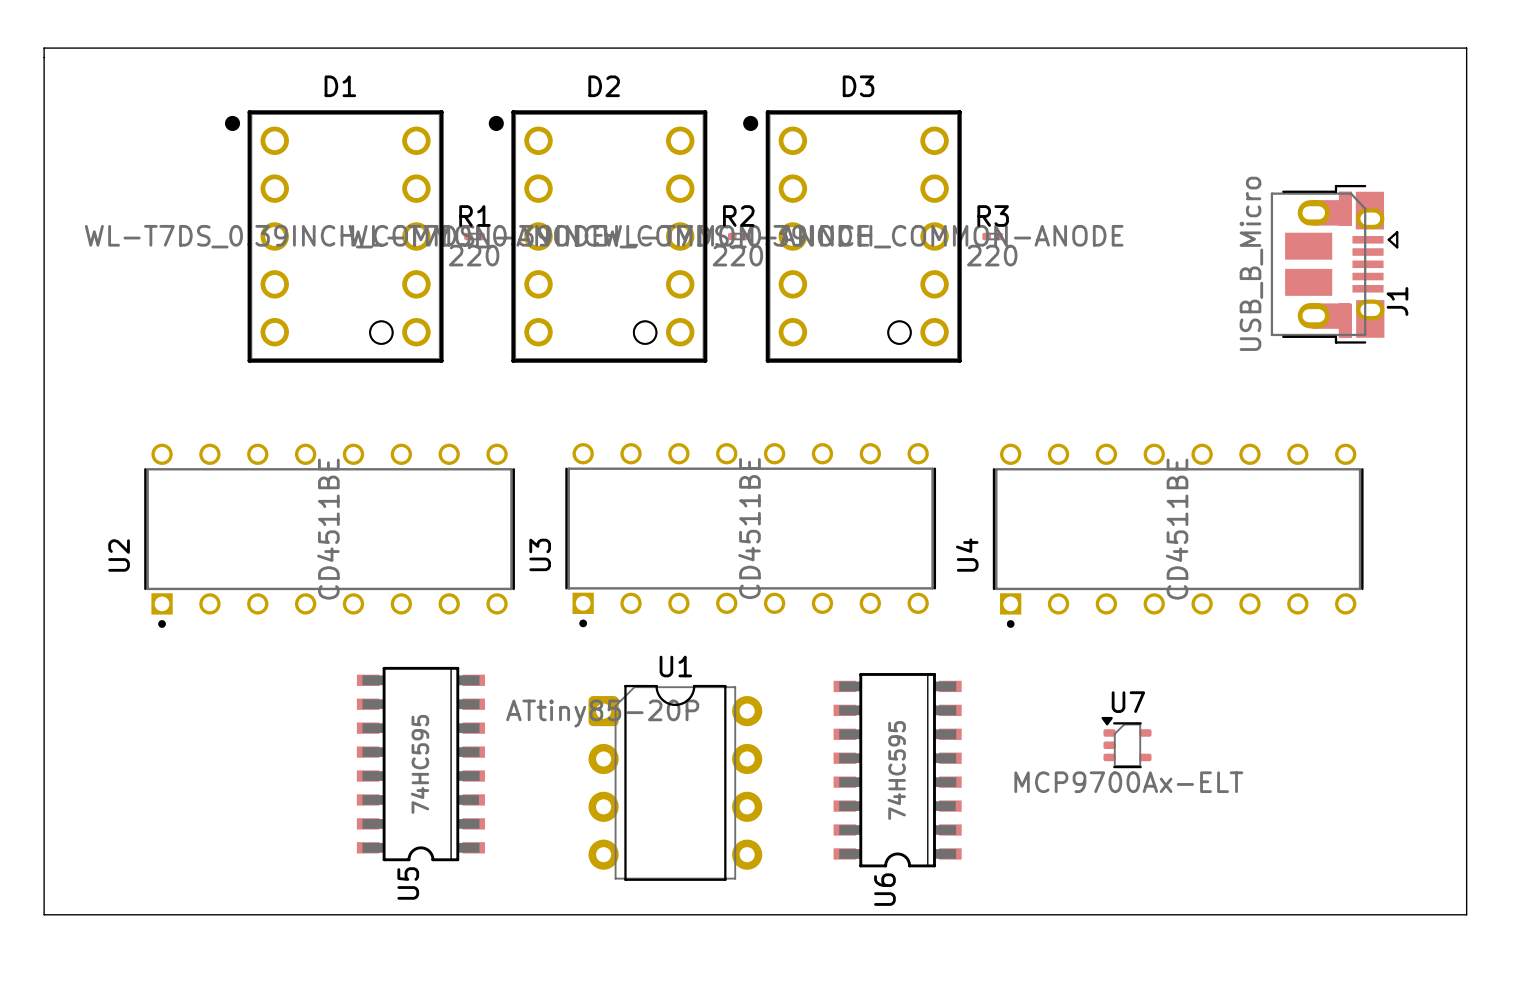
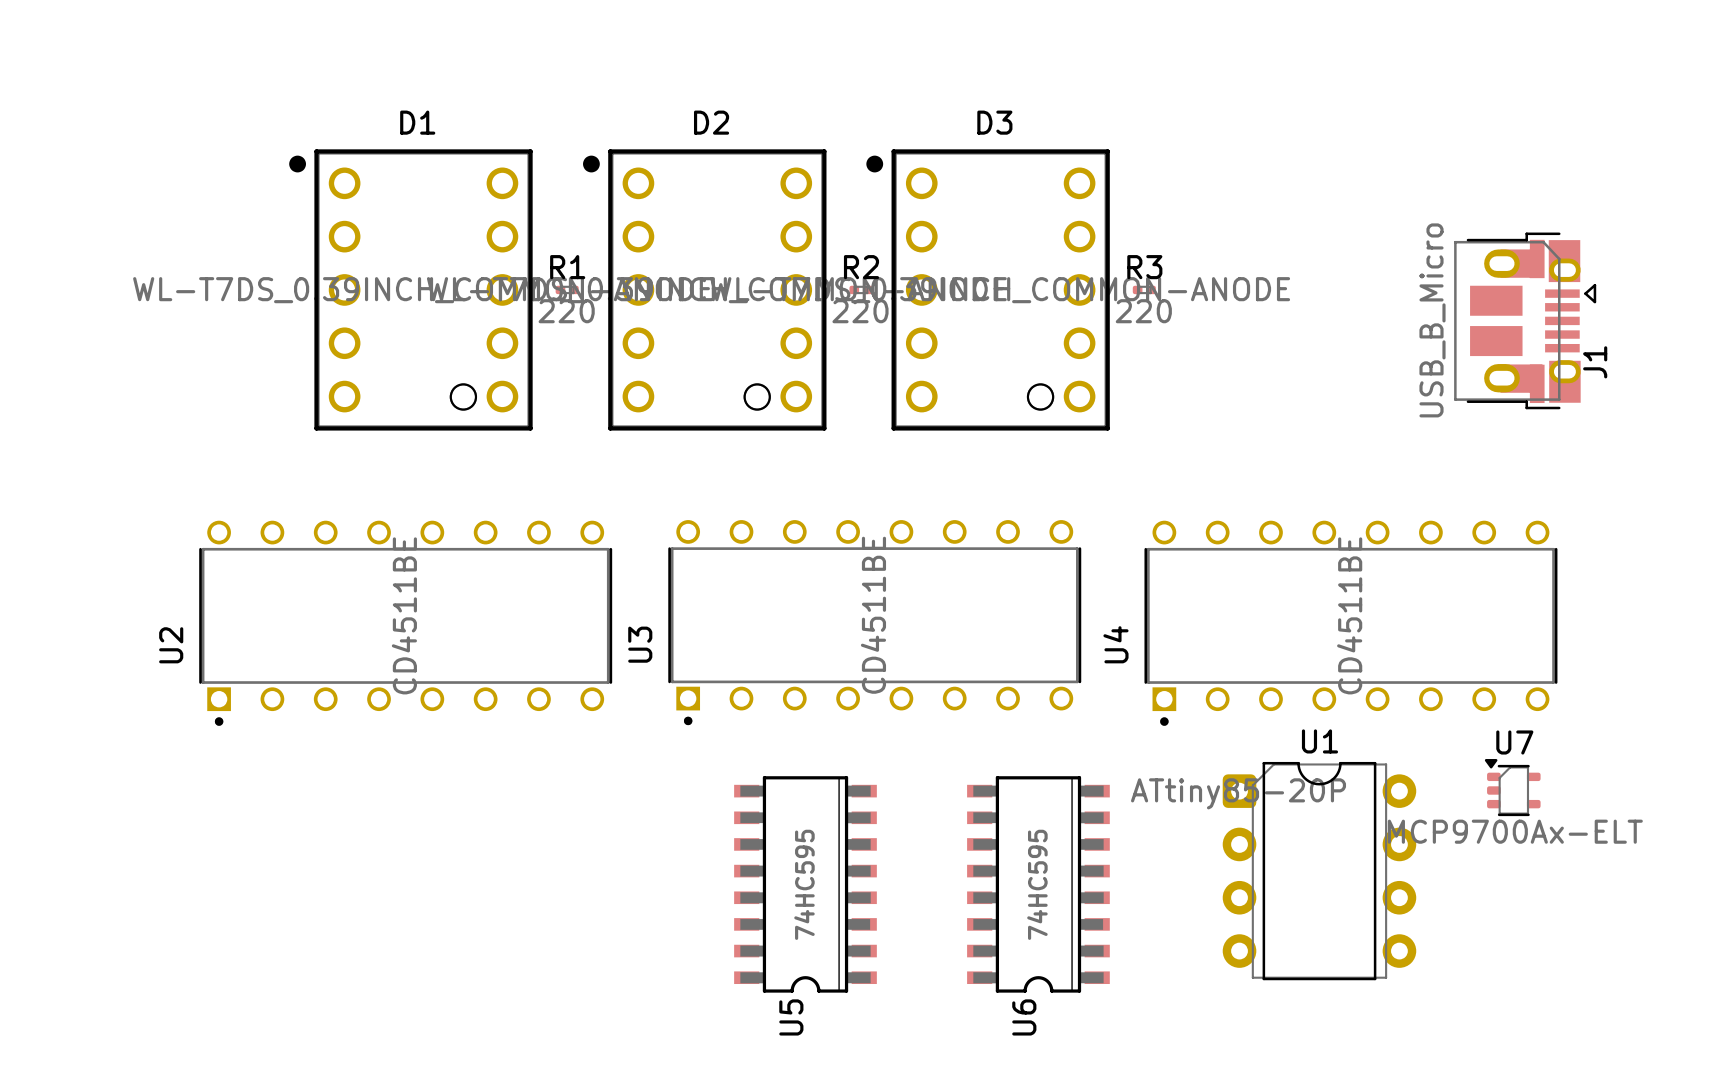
board edge: (44, 48) (44, 914) (1466, 914) (1466, 48) (44, 48) -> none
U7 position: (1126, 742) -> (1512, 787)
U5 position: (420, 764) -> (805, 884)
U1 position: (675, 782) -> (1319, 871)

